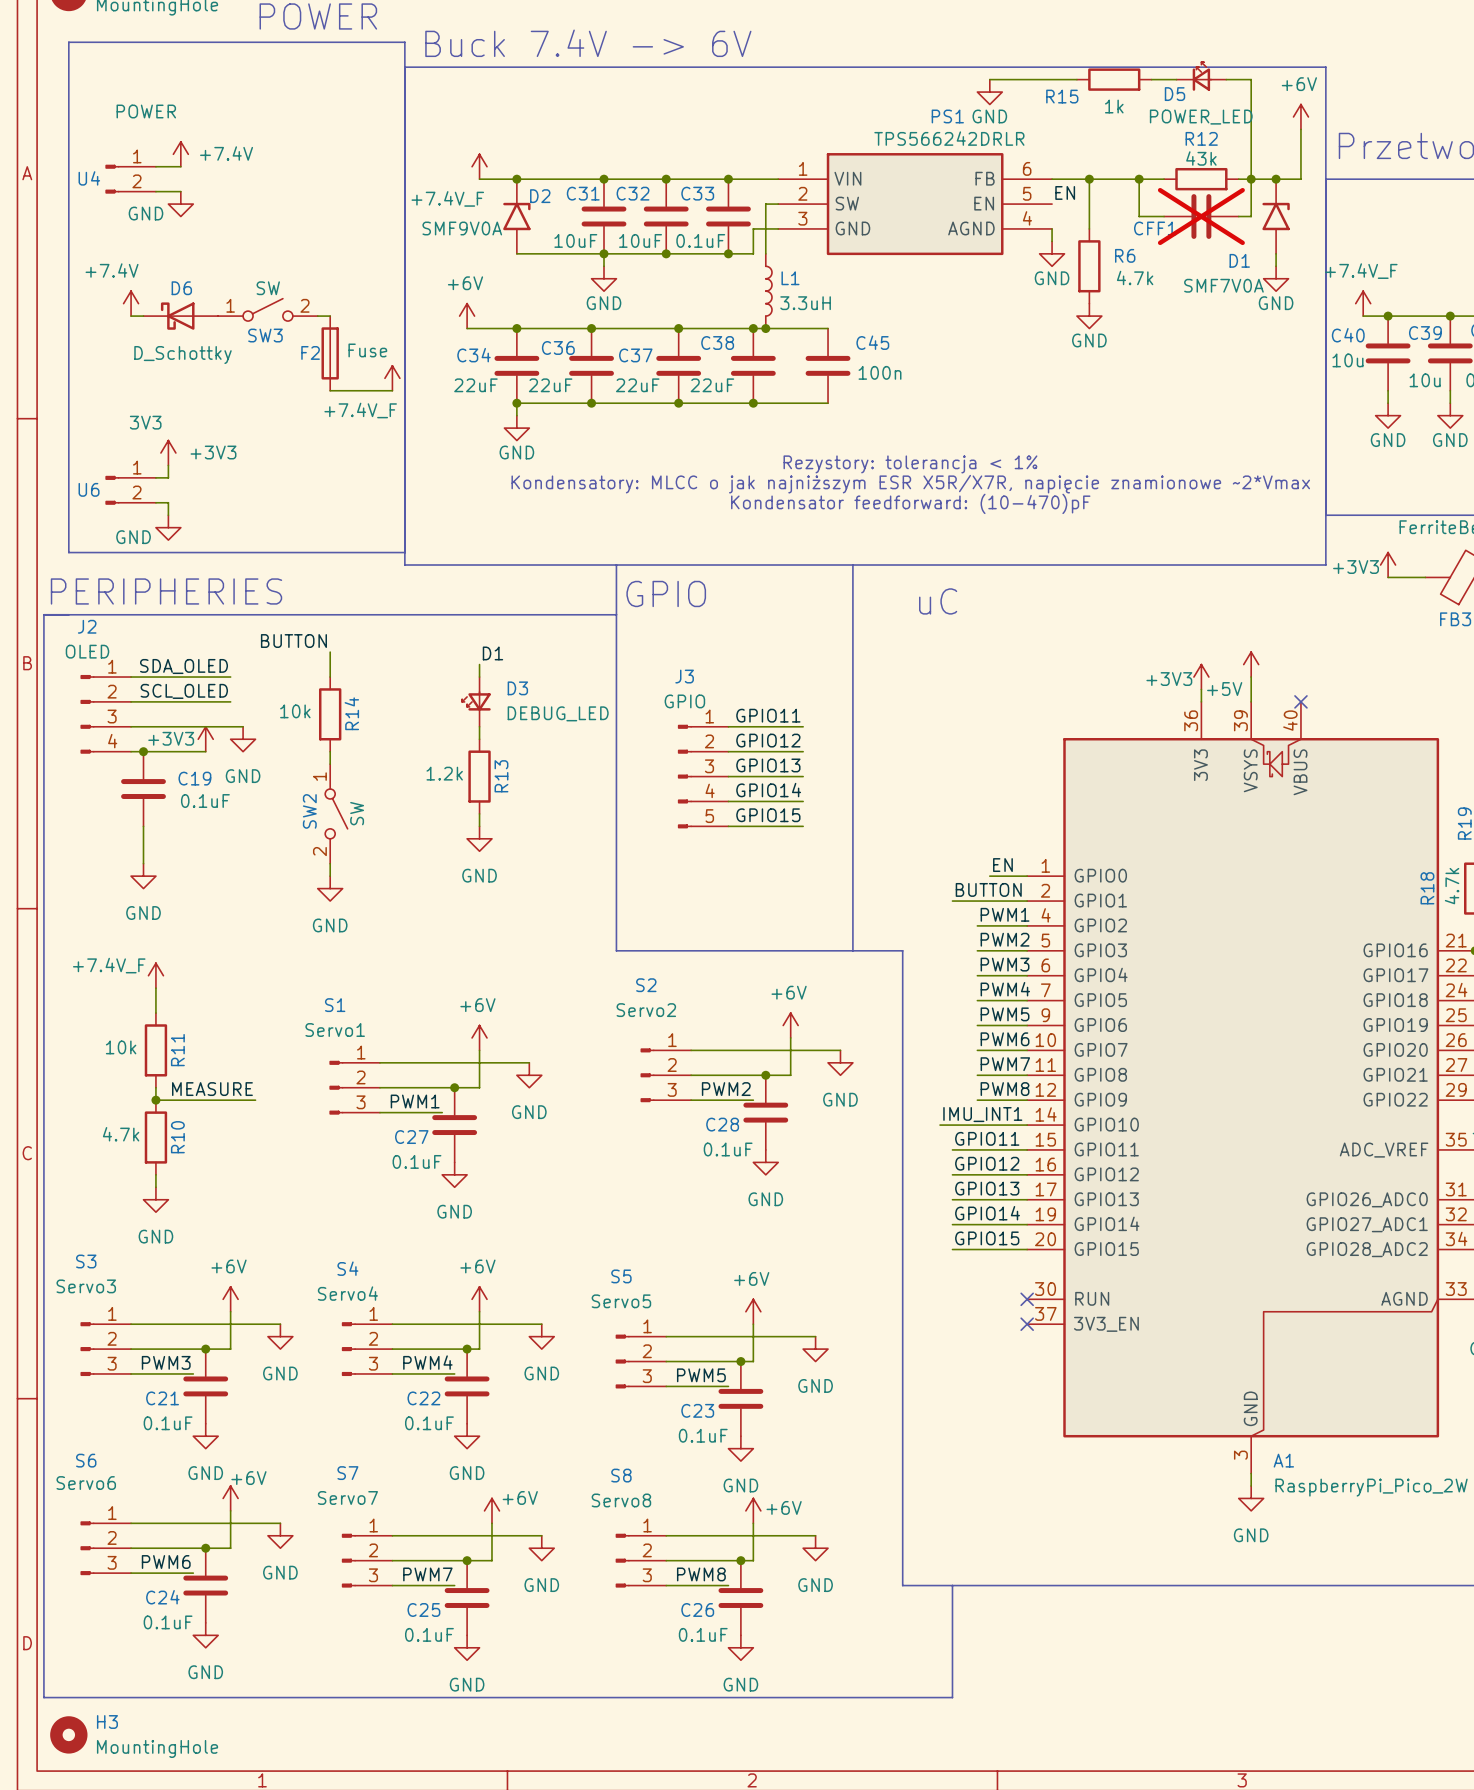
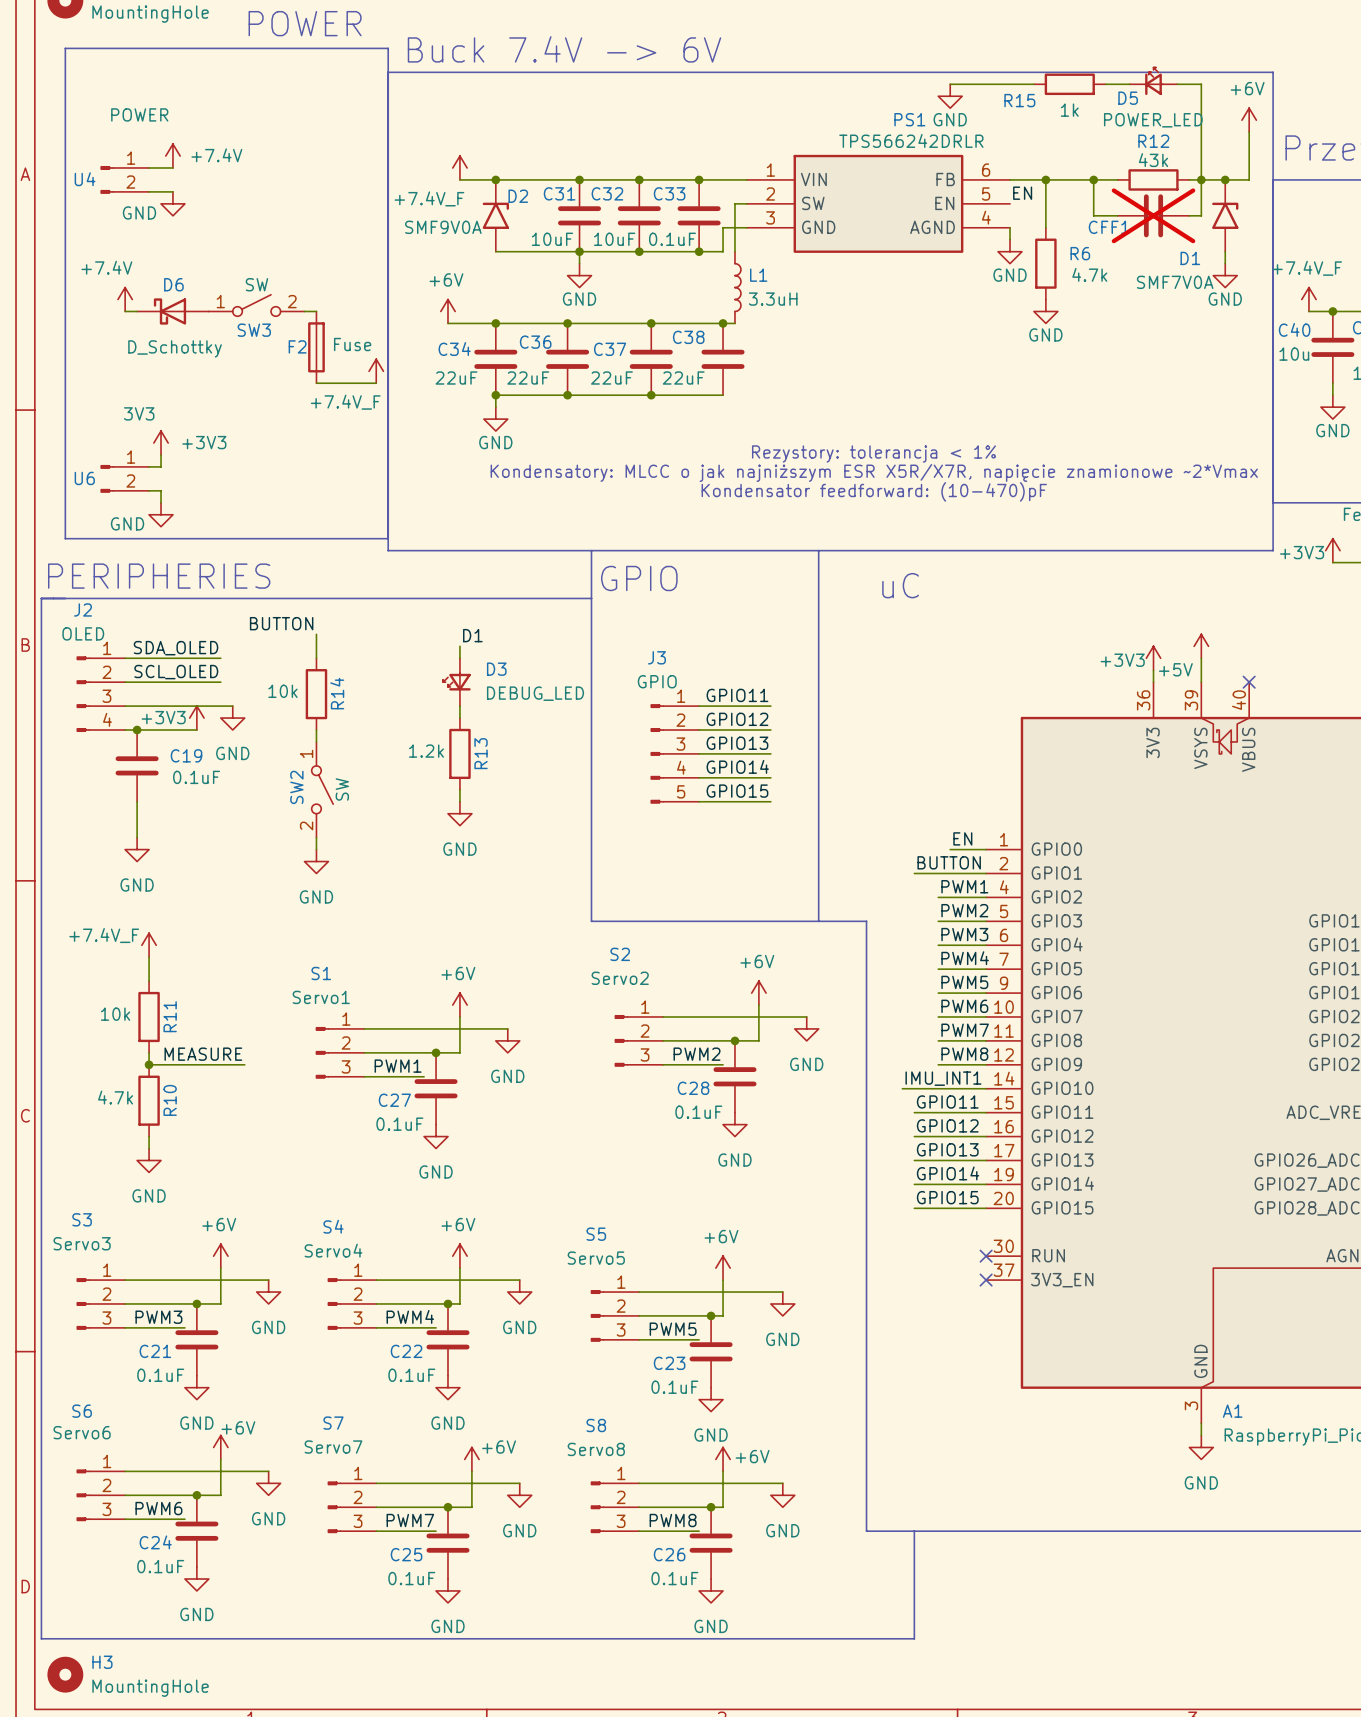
wire: (765, 328) (828, 328) -> none
junction: (765, 328) -> none
C45: 100n (828, 365) -> none
wire: (753, 403) (828, 403) -> none
junction: (753, 403) -> none

